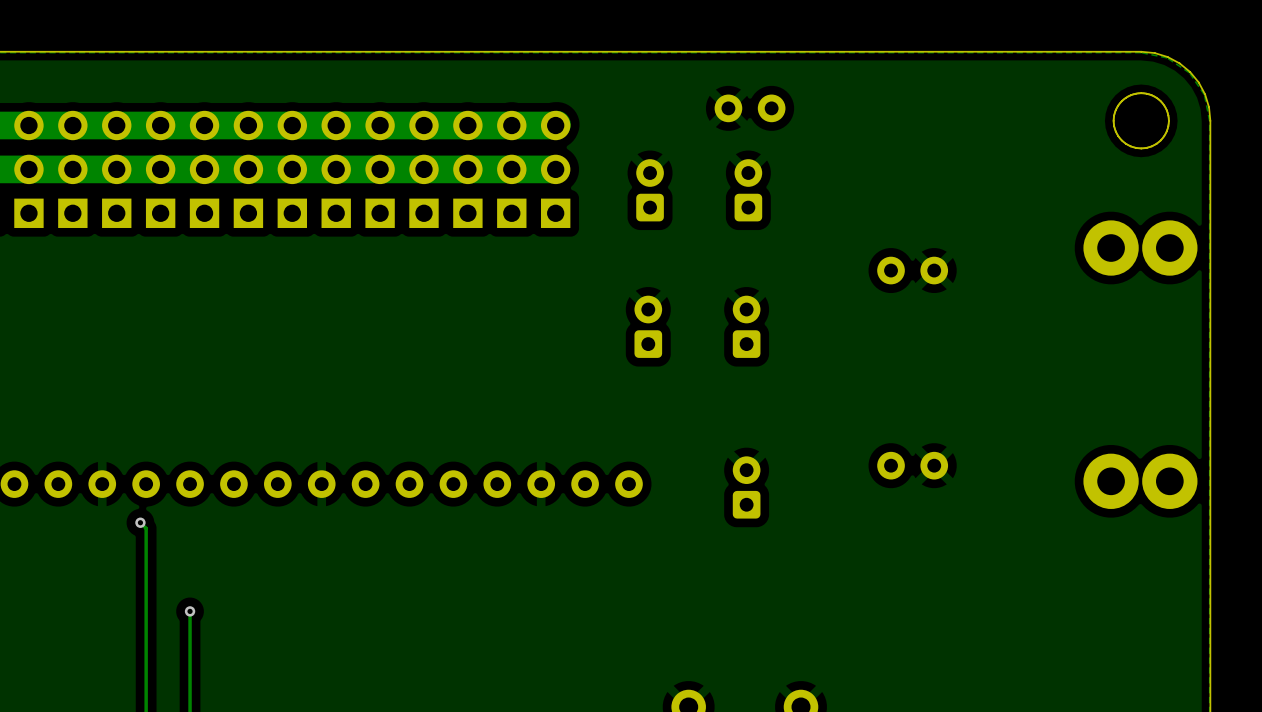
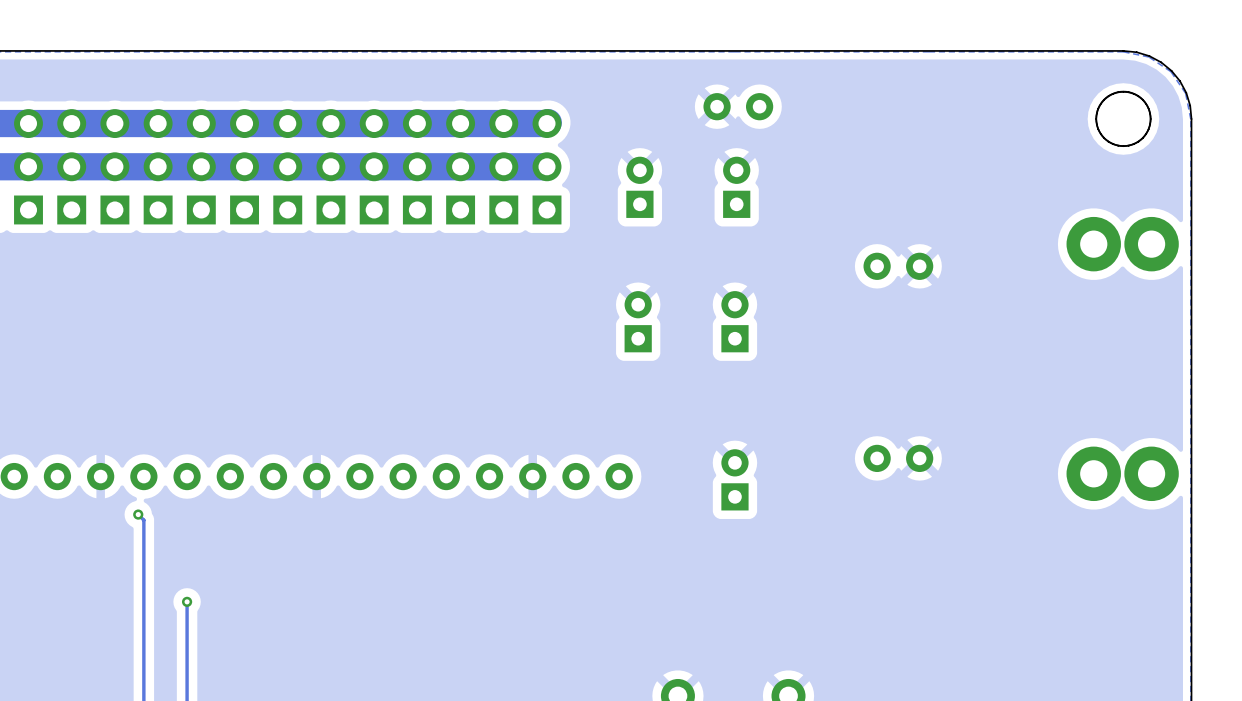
part footprint: [636, 159, 664, 222] -> [626, 156, 654, 218]
part footprint: [734, 159, 763, 222] -> [723, 156, 751, 218]
part footprint: [634, 295, 663, 358] -> [624, 291, 652, 353]
part footprint: [732, 295, 761, 358] -> [721, 291, 749, 353]
part footprint: [732, 456, 761, 519] -> [721, 449, 749, 511]

